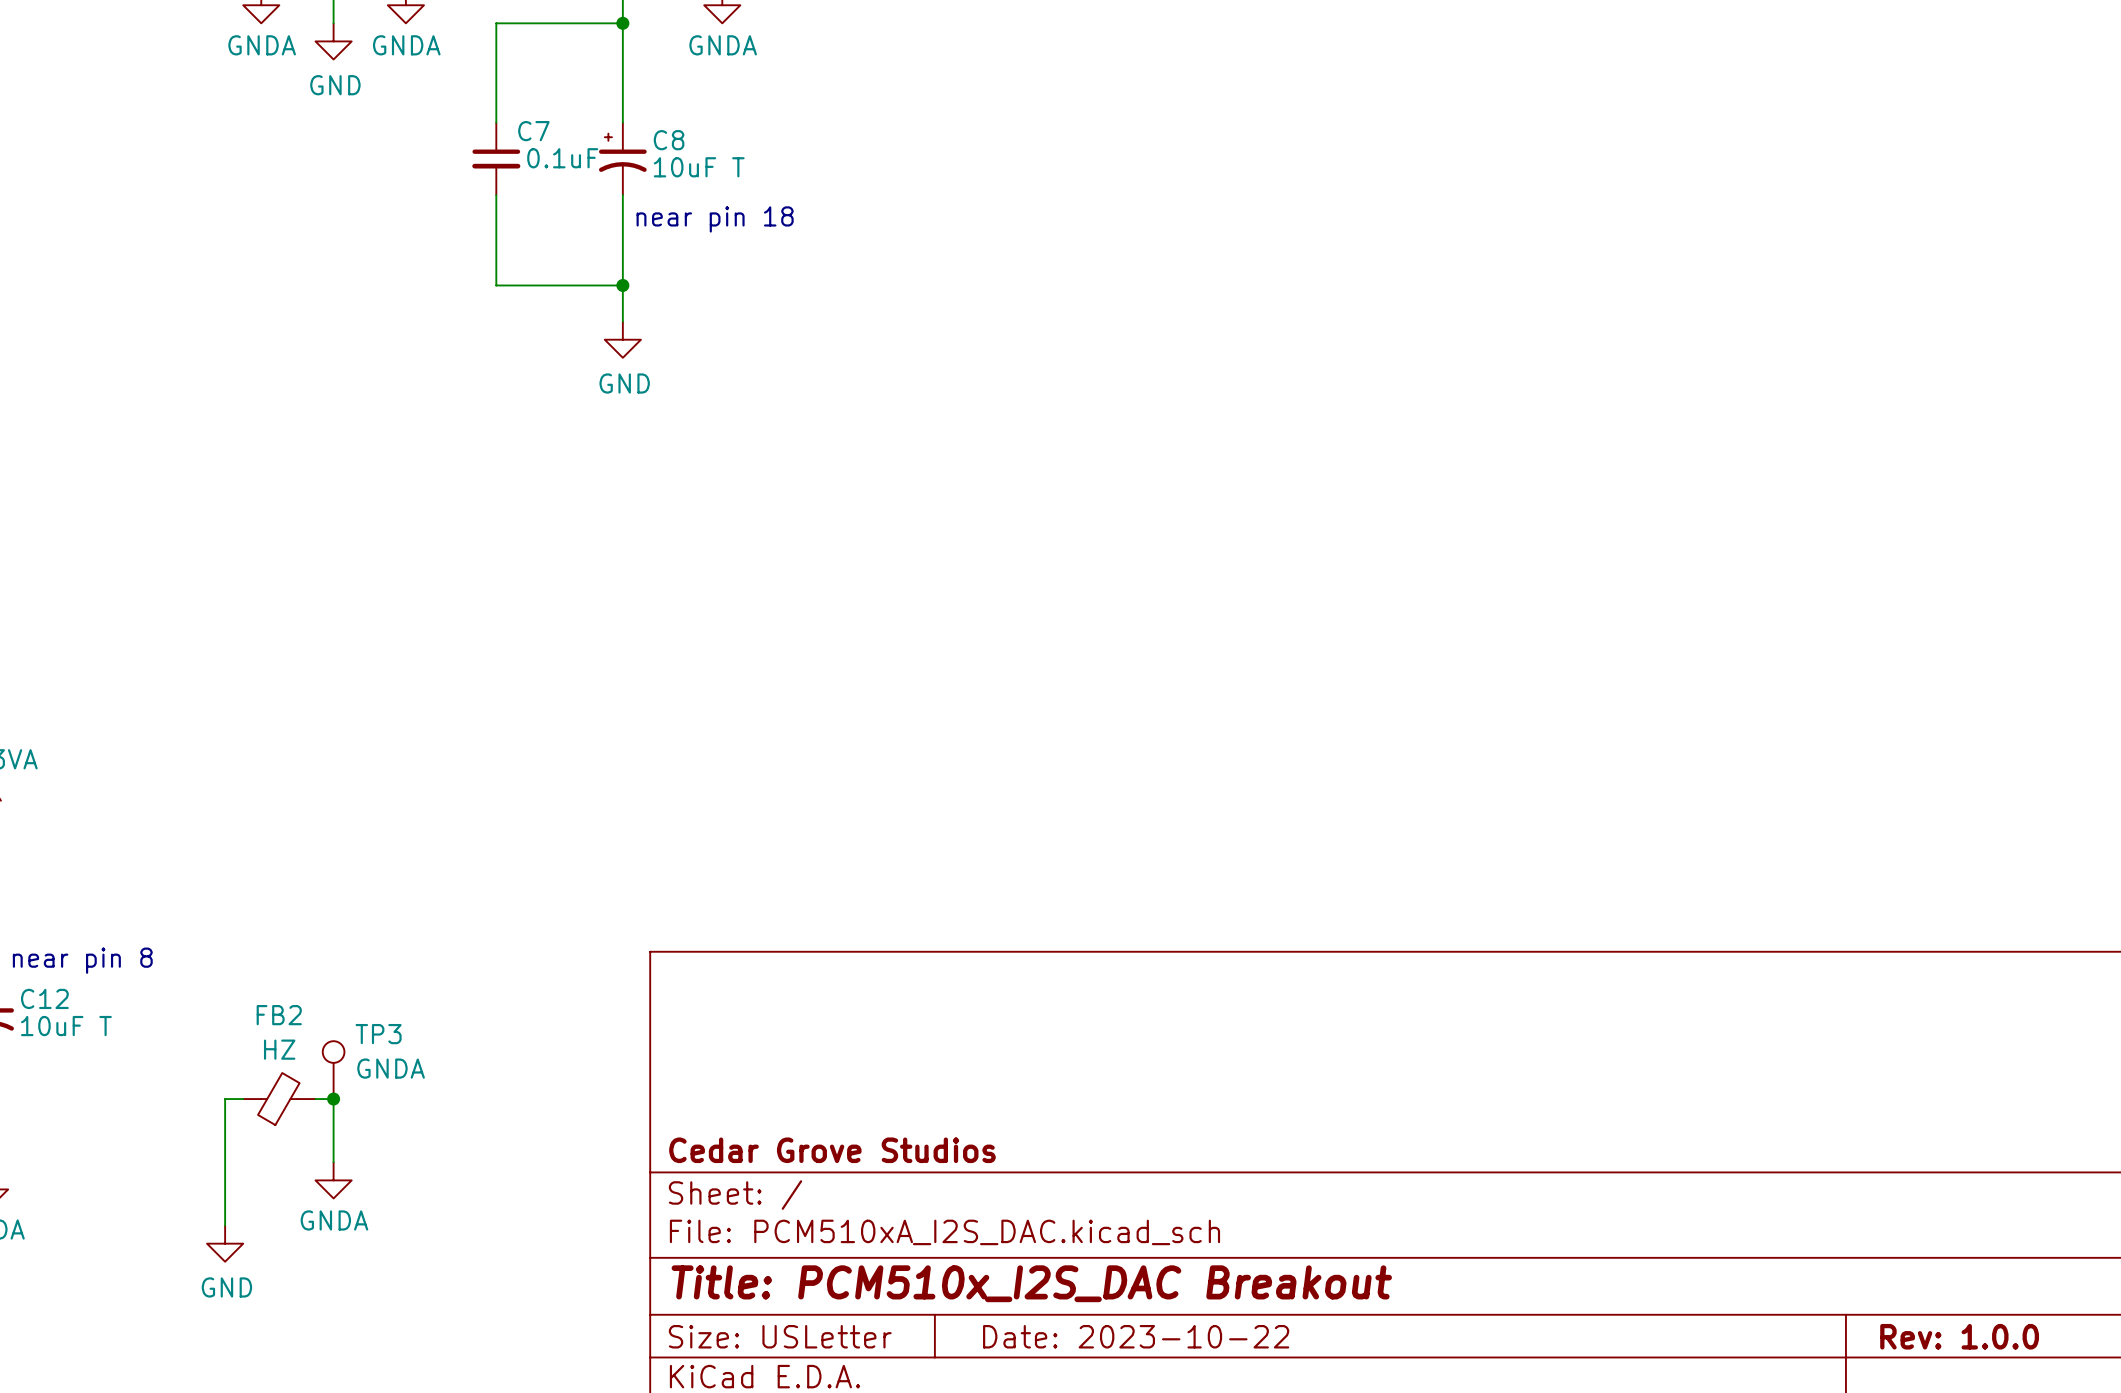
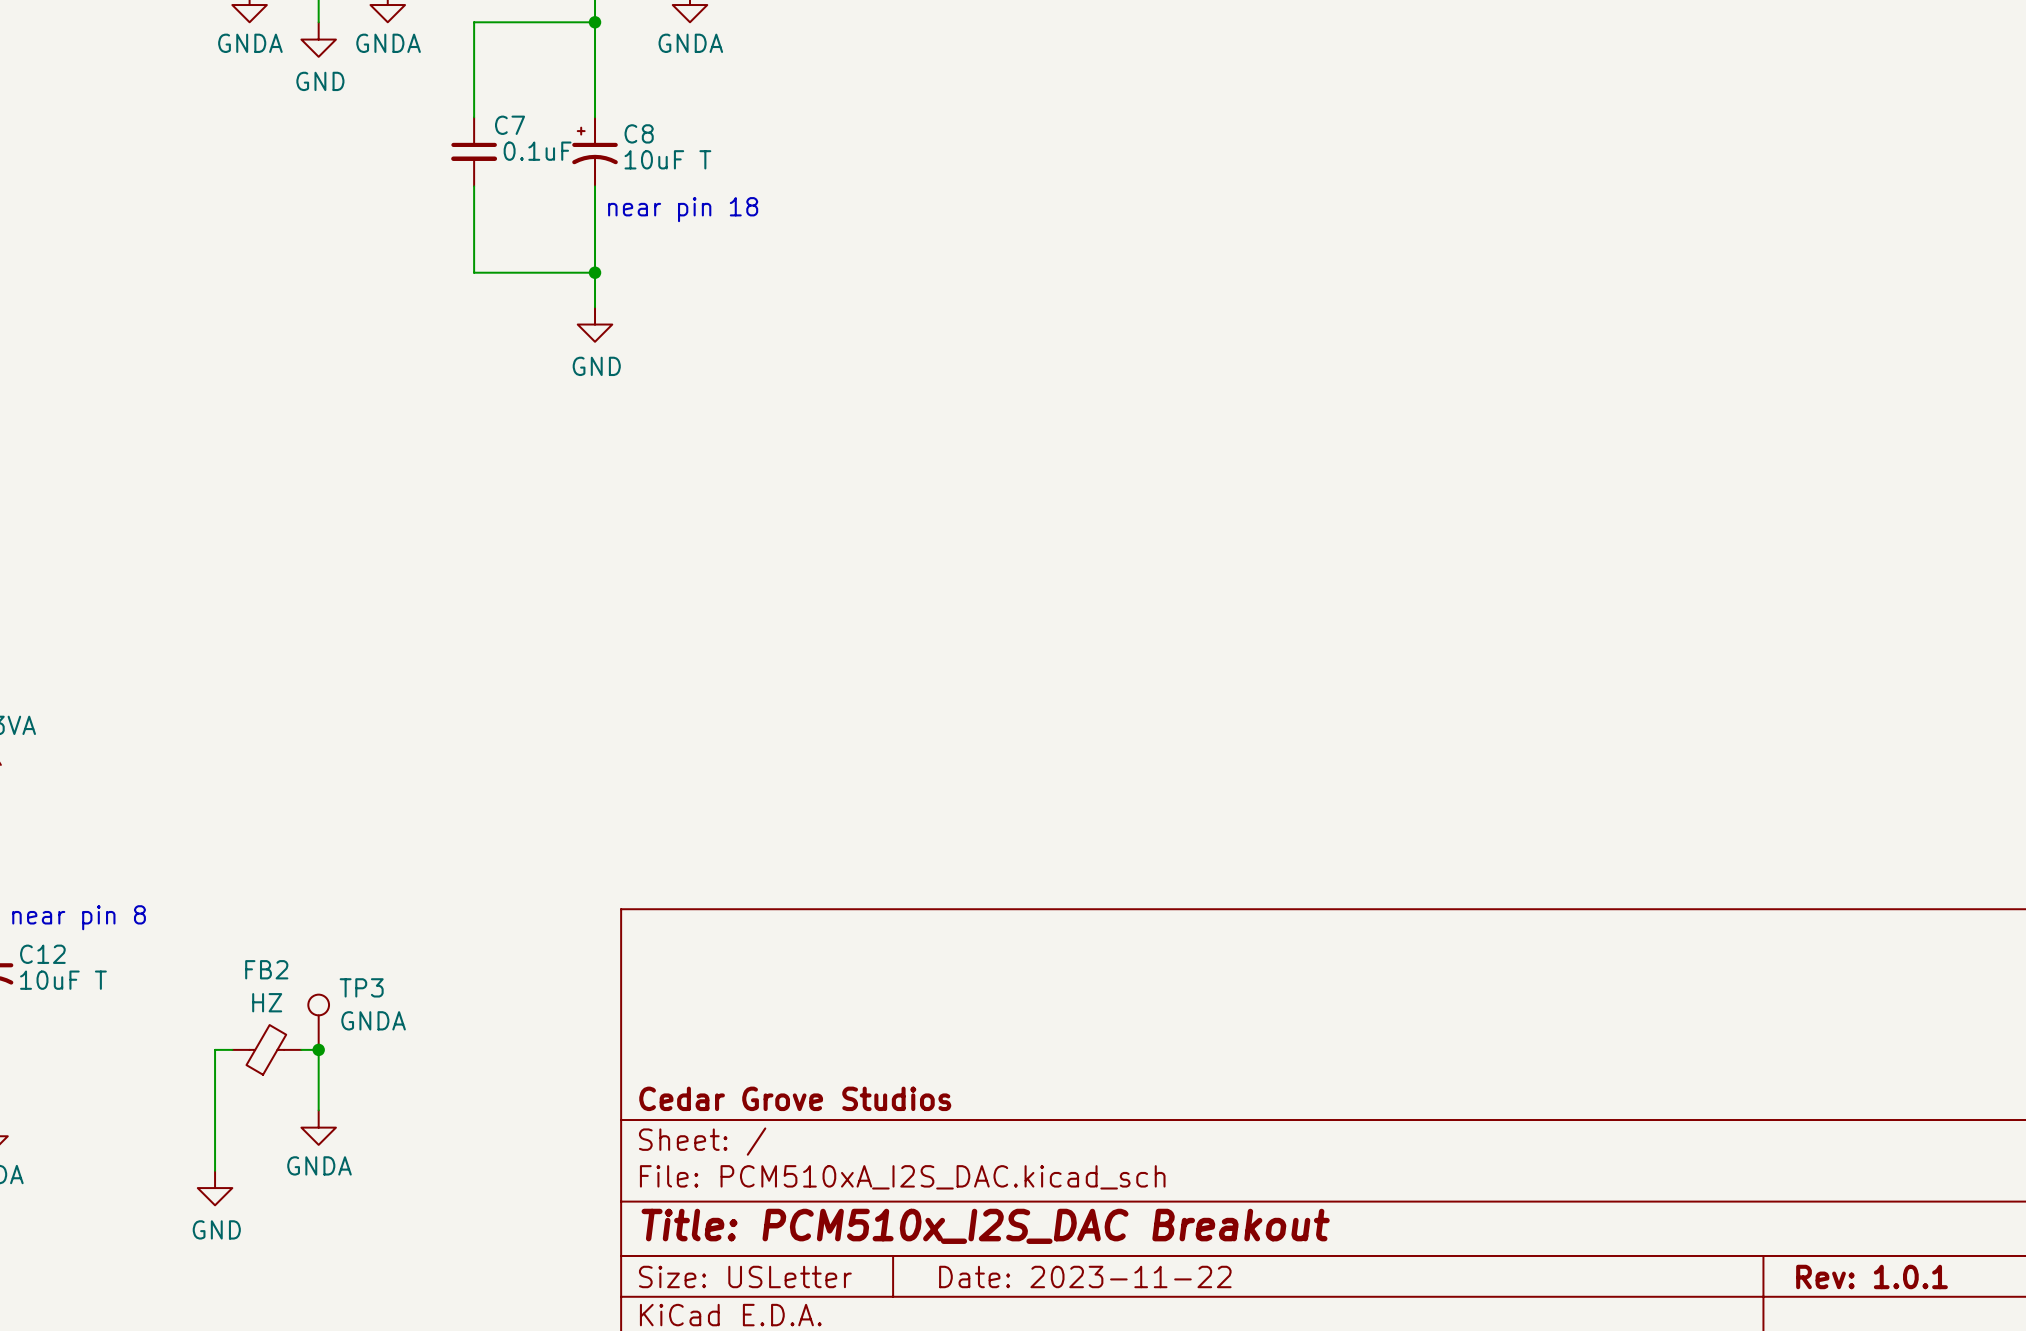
title block: Date: 2023-10-22 (1136, 1336) -> Date: 2023-11-22 (1085, 1276)
title block: Rev: 1.0.0 (1959, 1336) -> Rev: 1.0.1 (1872, 1276)

